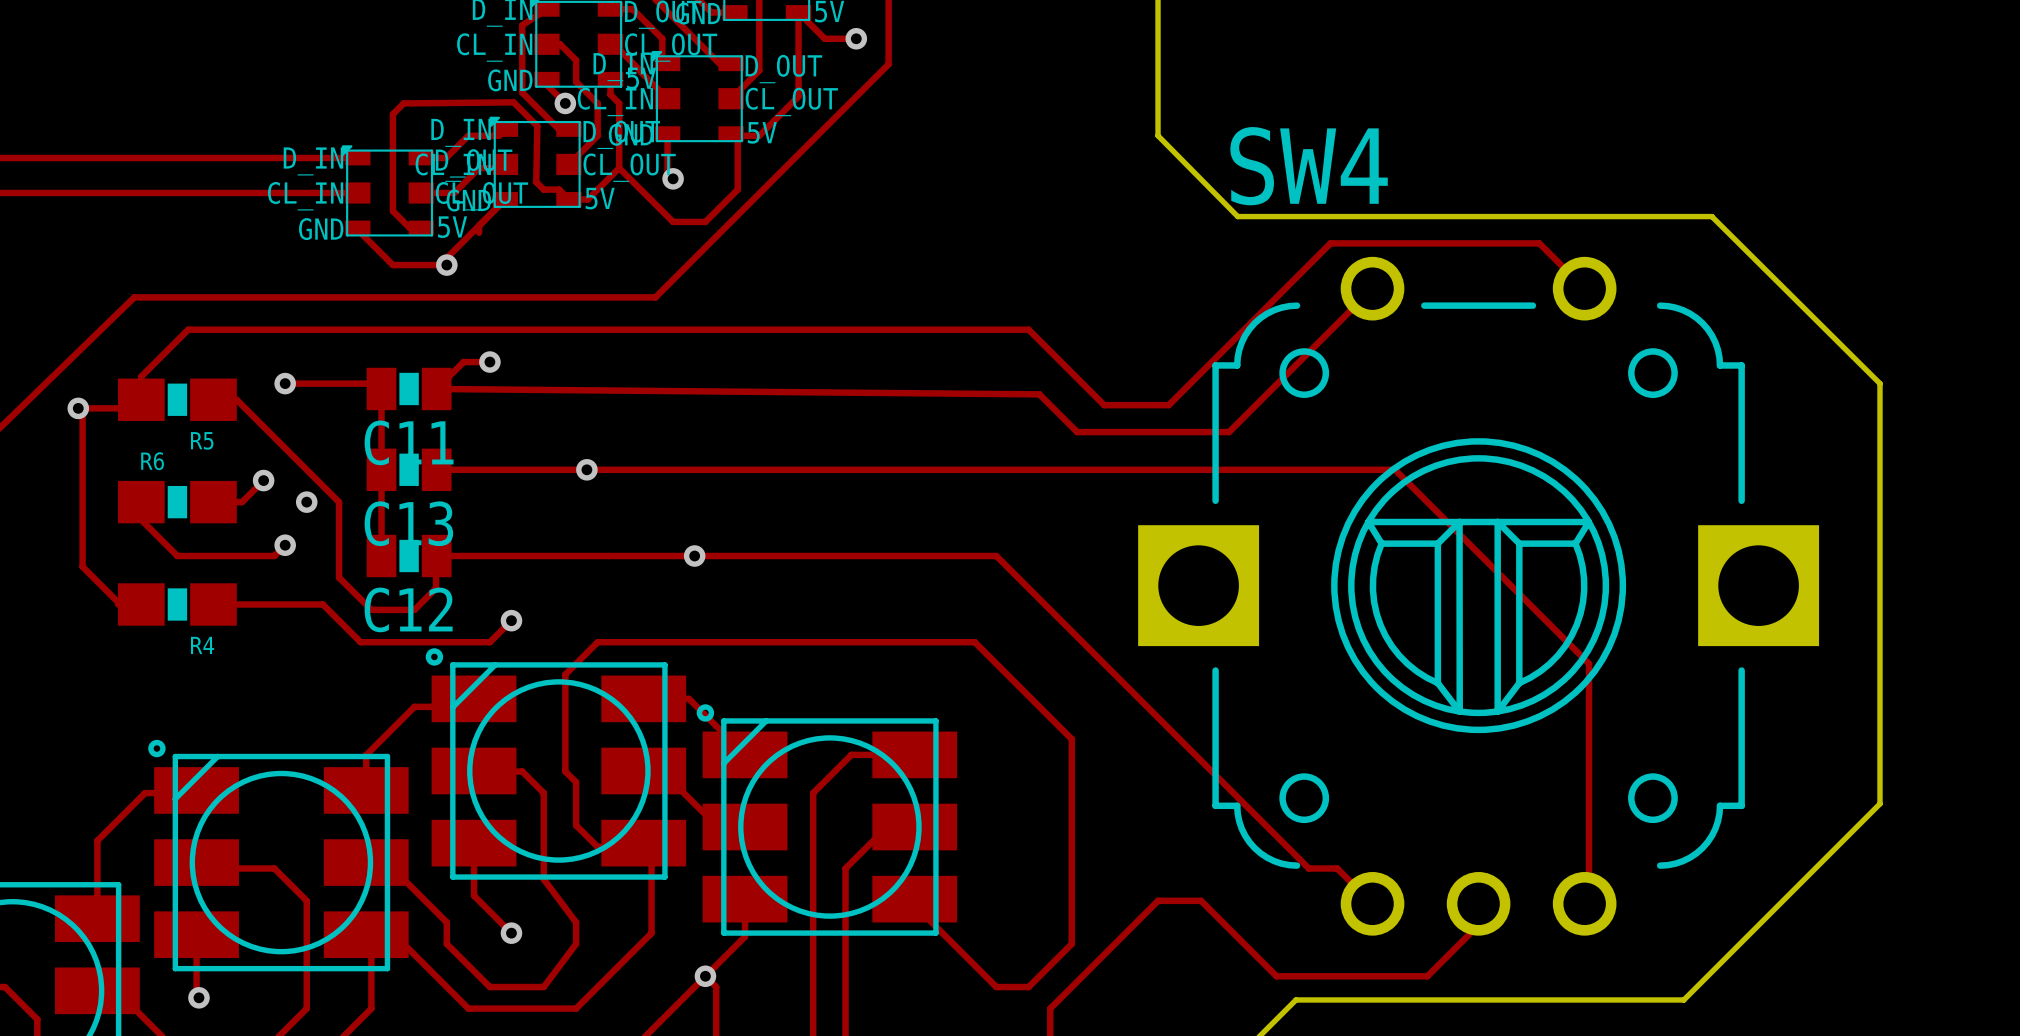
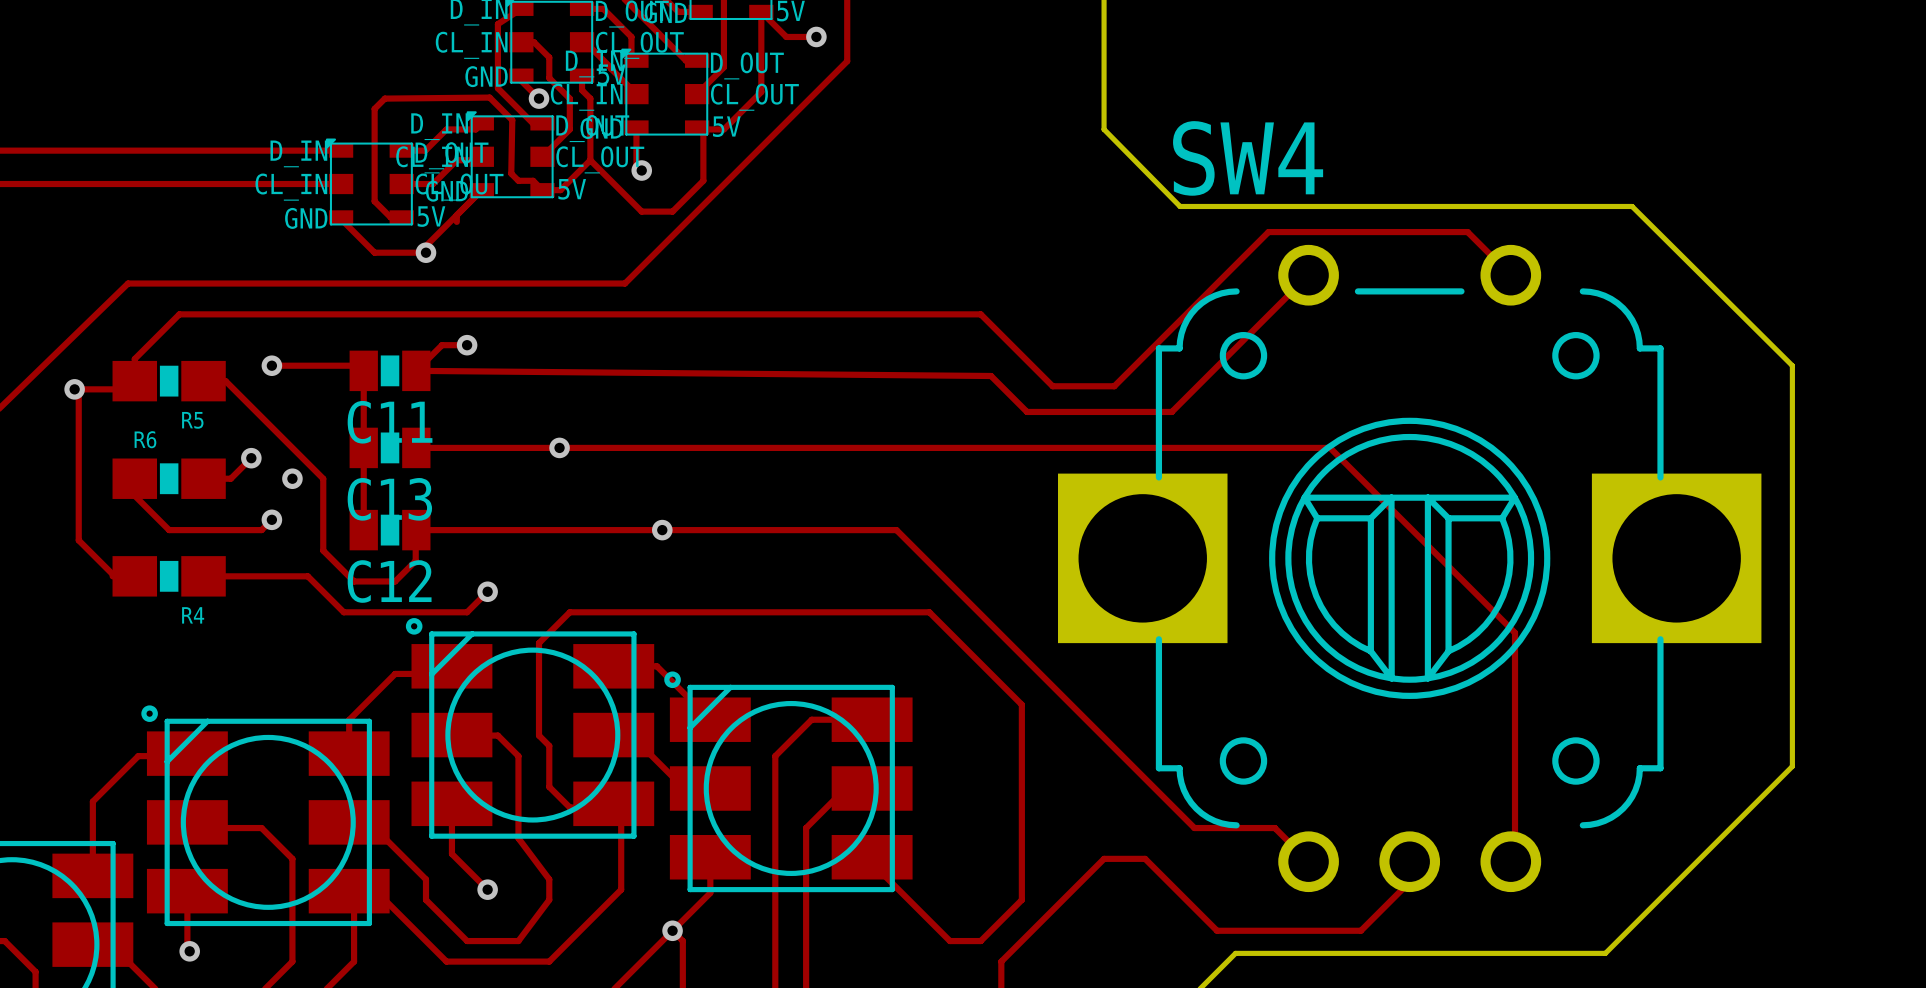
SW4 footprint: [1138, 256, 1820, 936] -> [1057, 244, 1762, 893]
track: (940, 556) (996, 556) (1308, 868) -> (896, 530) (1194, 828) (1247, 828)

